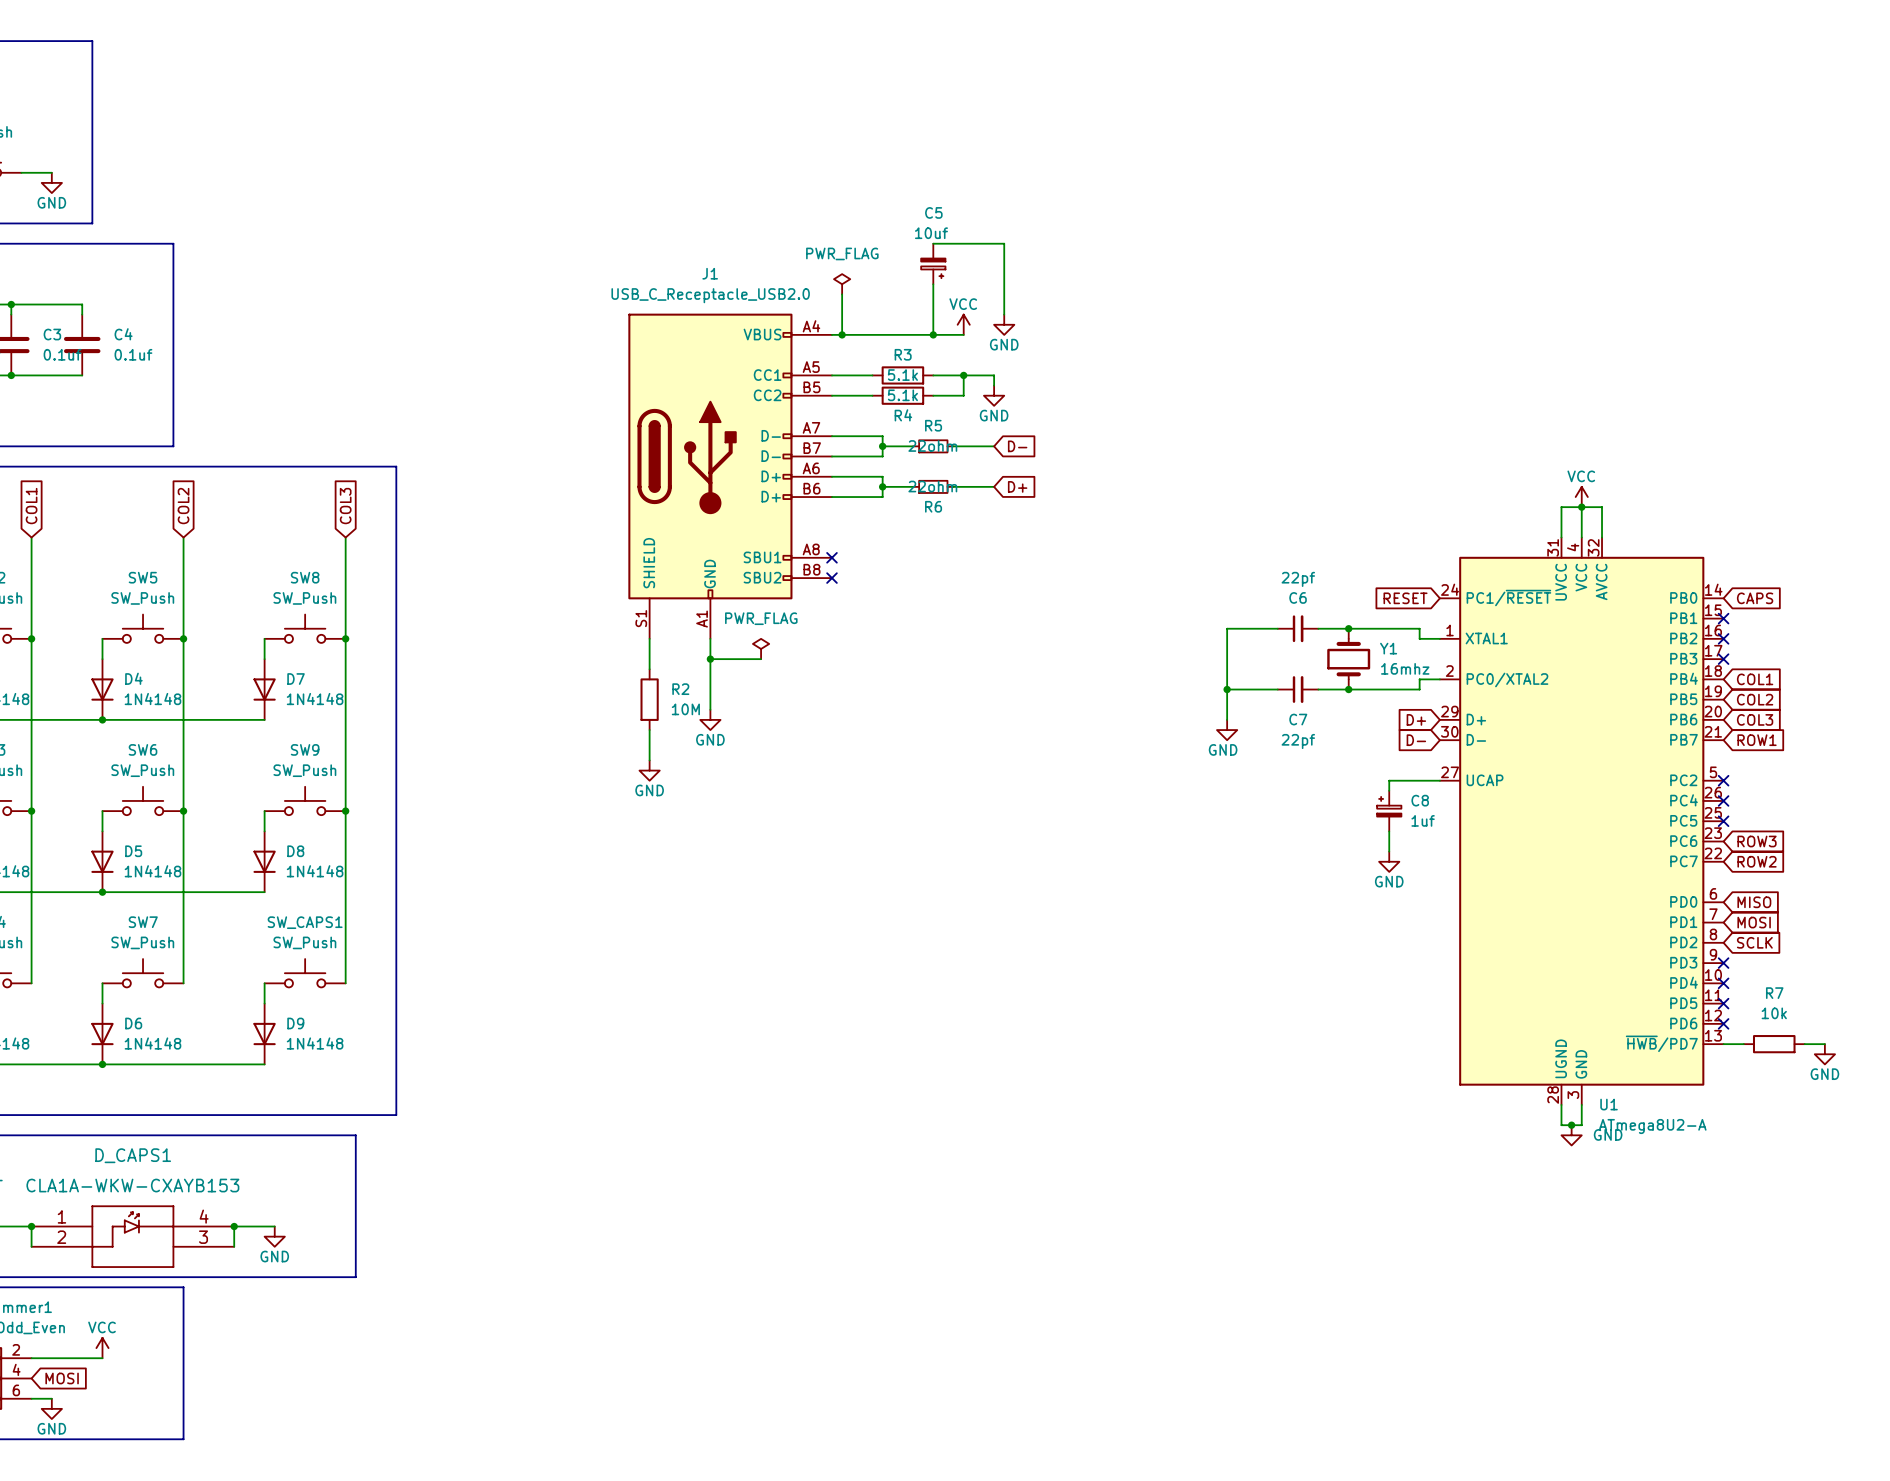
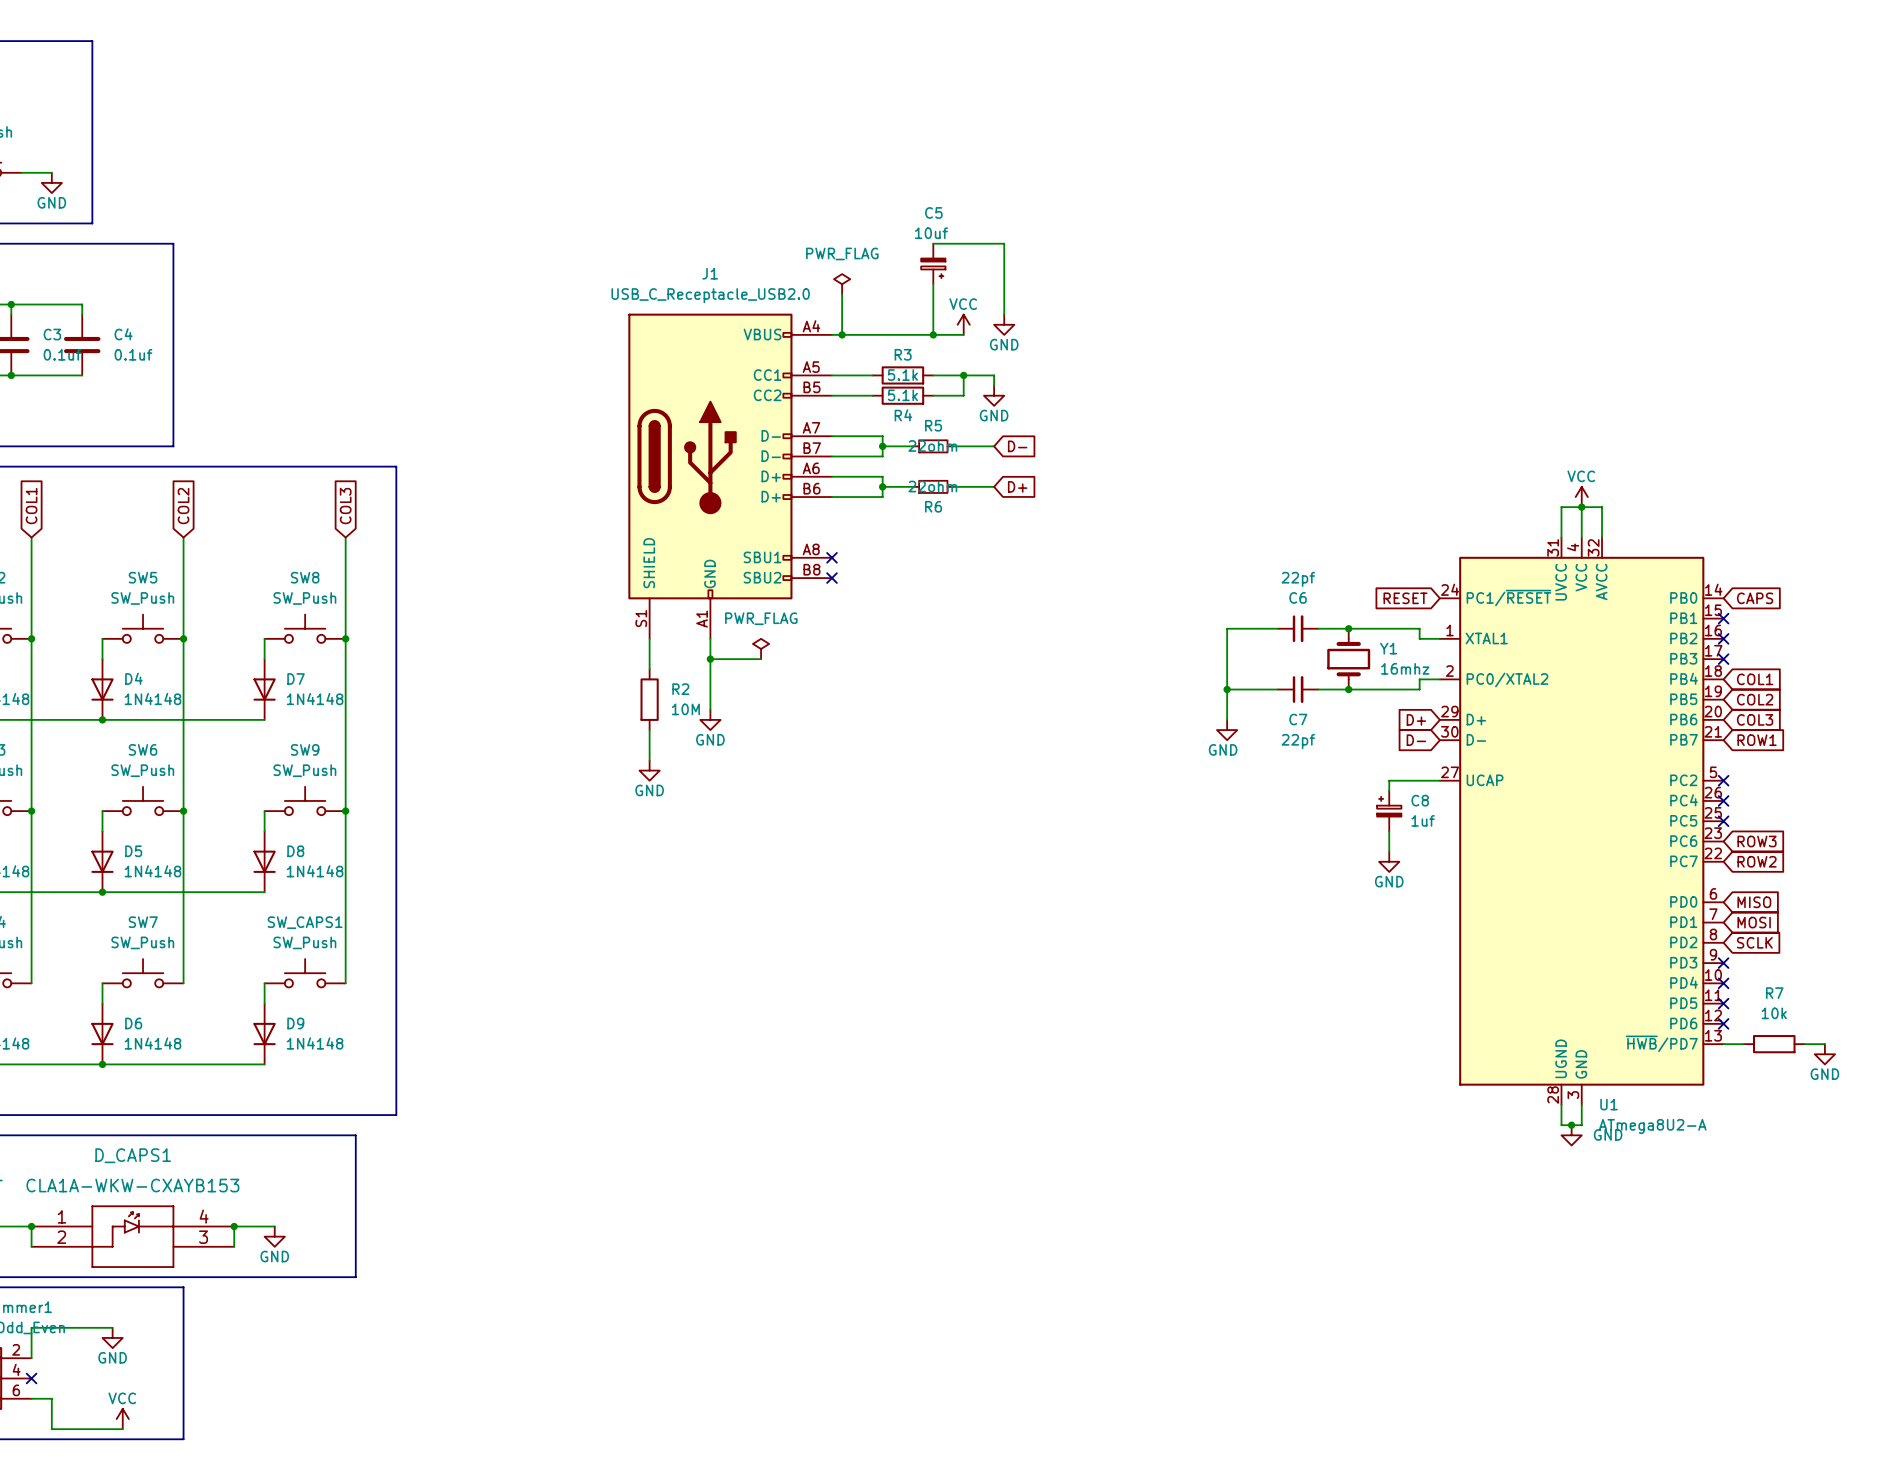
power symbol position: VCC (102, 1348) -> VCC (122, 1419)
wire: (31, 1358) (102, 1358) -> (31, 1358) (31, 1327) (112, 1327)
no-connect mark: none -> (31, 1378)
global label: MOSI (62, 1378) -> none
wire: none -> (51, 1398) (51, 1429) (122, 1429)
power symbol position: GND (51, 1408) -> GND (112, 1337)

